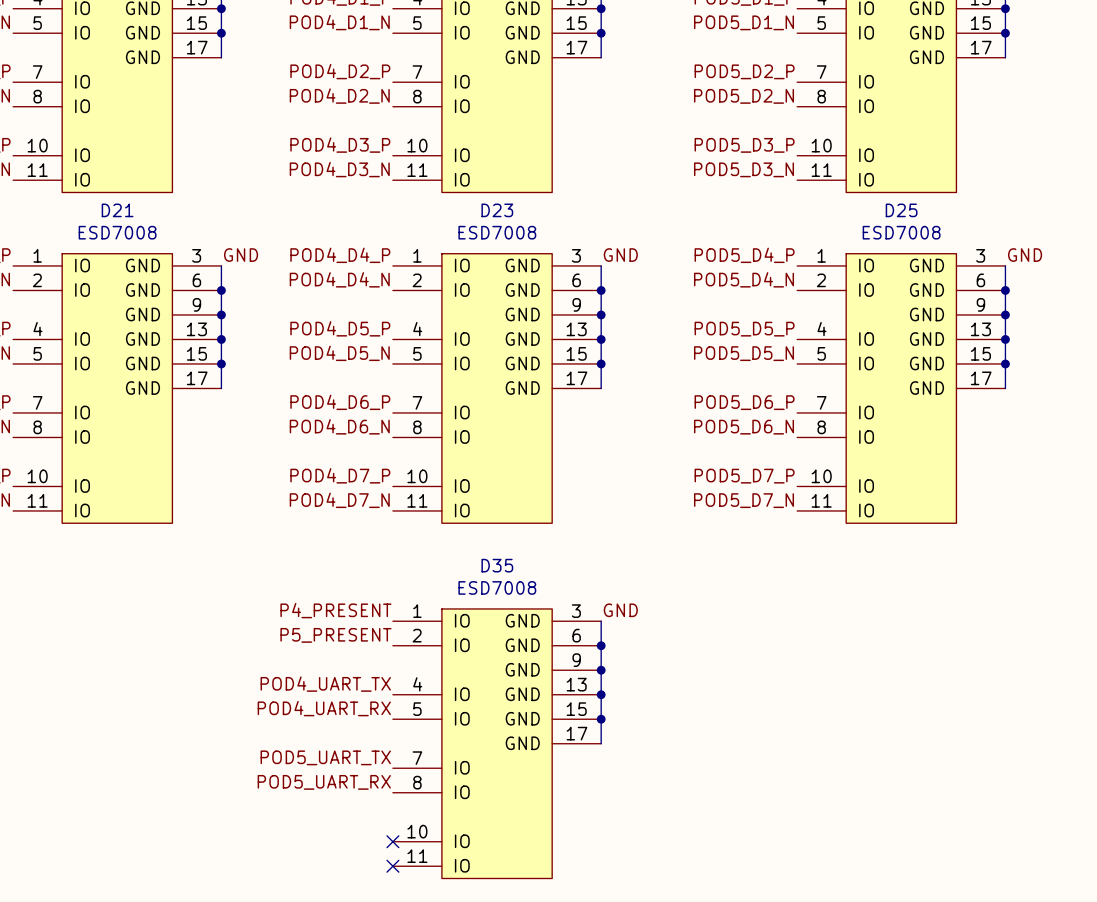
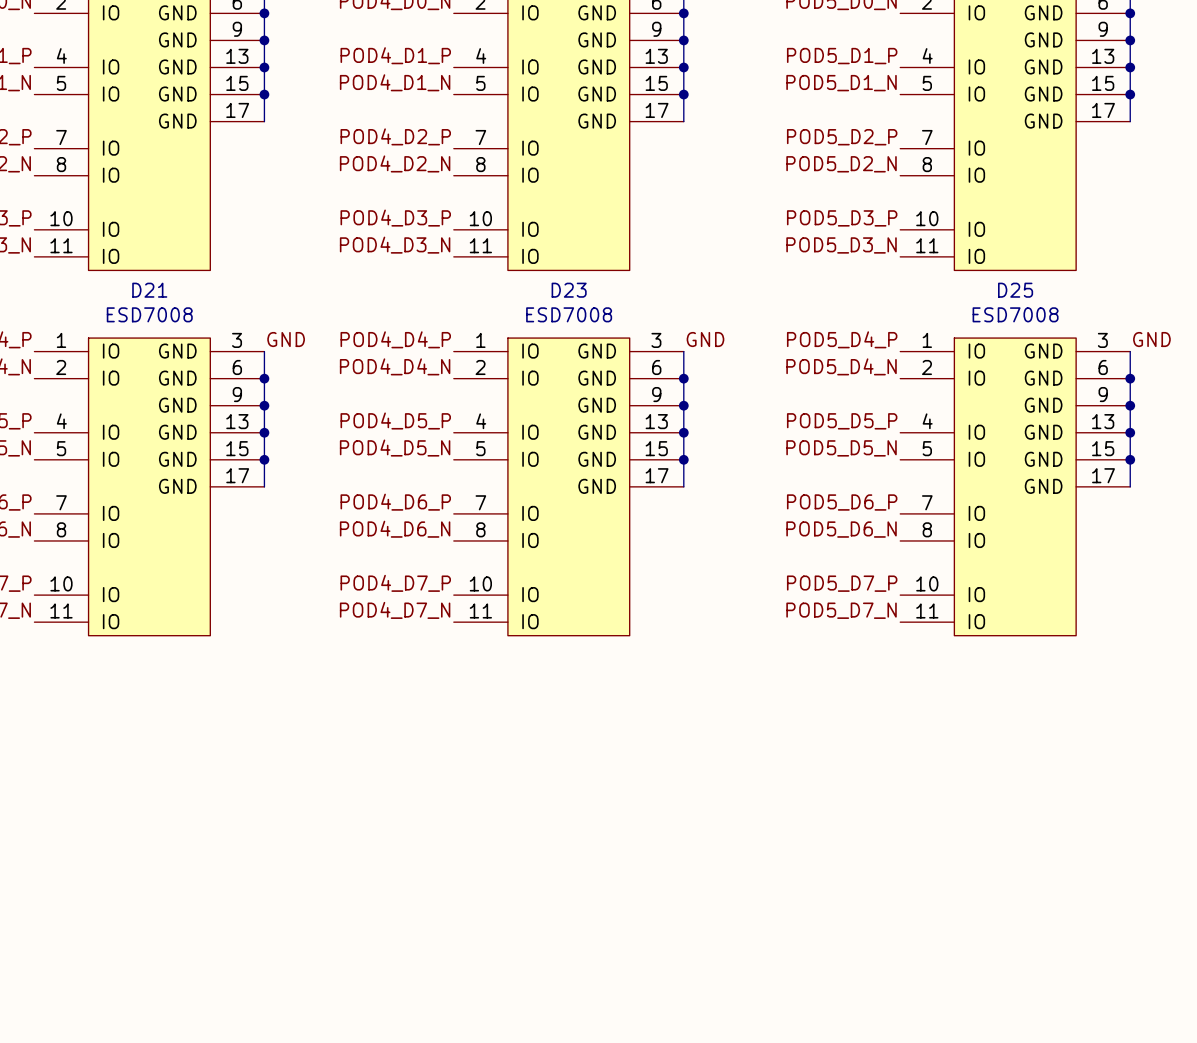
label: P4_PRESENT (335, 610) -> none
label: GND (620, 610) -> none
wire: (601, 621) (601, 743) -> none
label: P5_PRESENT (335, 635) -> none
junction: (601, 645) -> none
junction: (601, 670) -> none
label: POD4_UART_TX (325, 684) -> none
junction: (601, 694) -> none
label: POD4_UART_RX (324, 708) -> none
junction: (601, 719) -> none
D35: ESD7008 (497, 743) -> none
label: POD5_UART_TX (325, 757) -> none
label: POD5_UART_RX (324, 782) -> none
no-connect mark: (392, 841) -> none
no-connect mark: (392, 866) -> none

